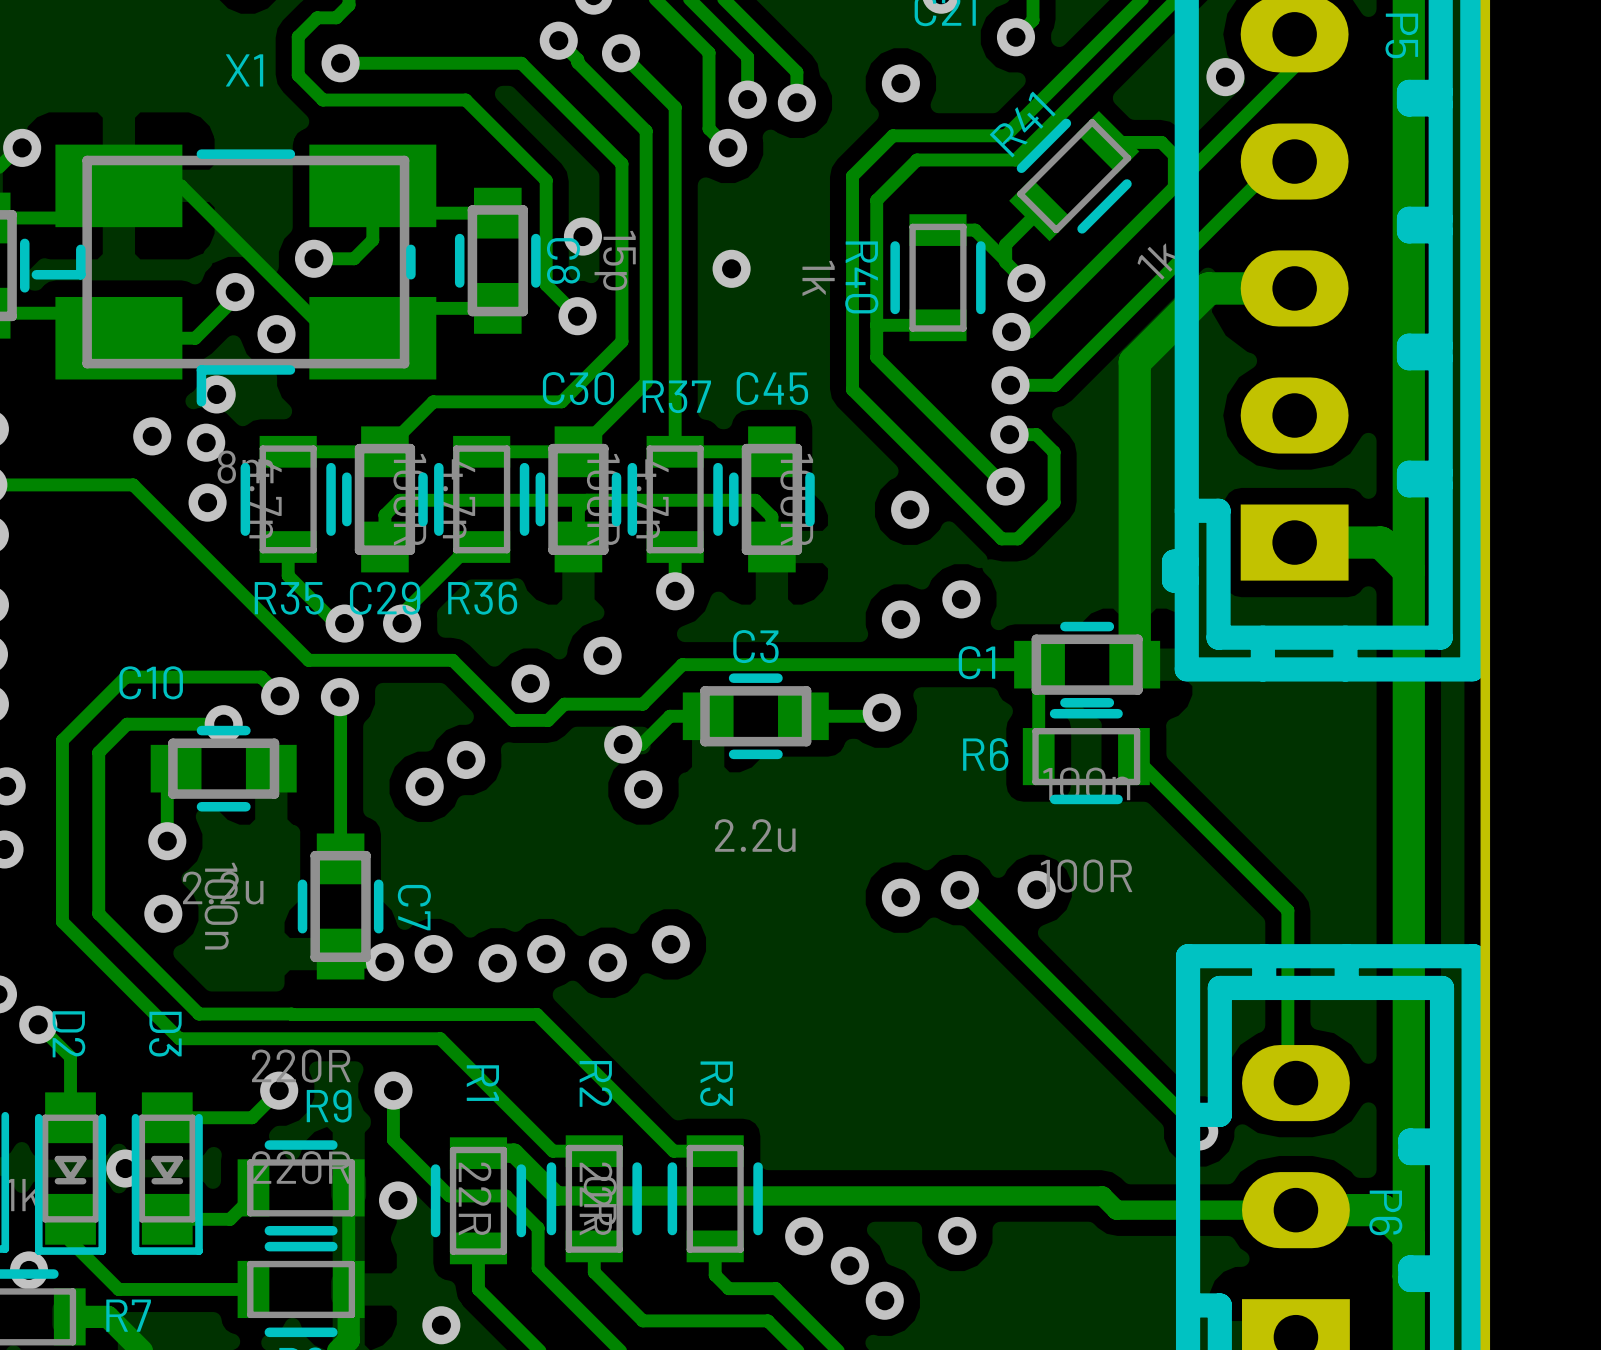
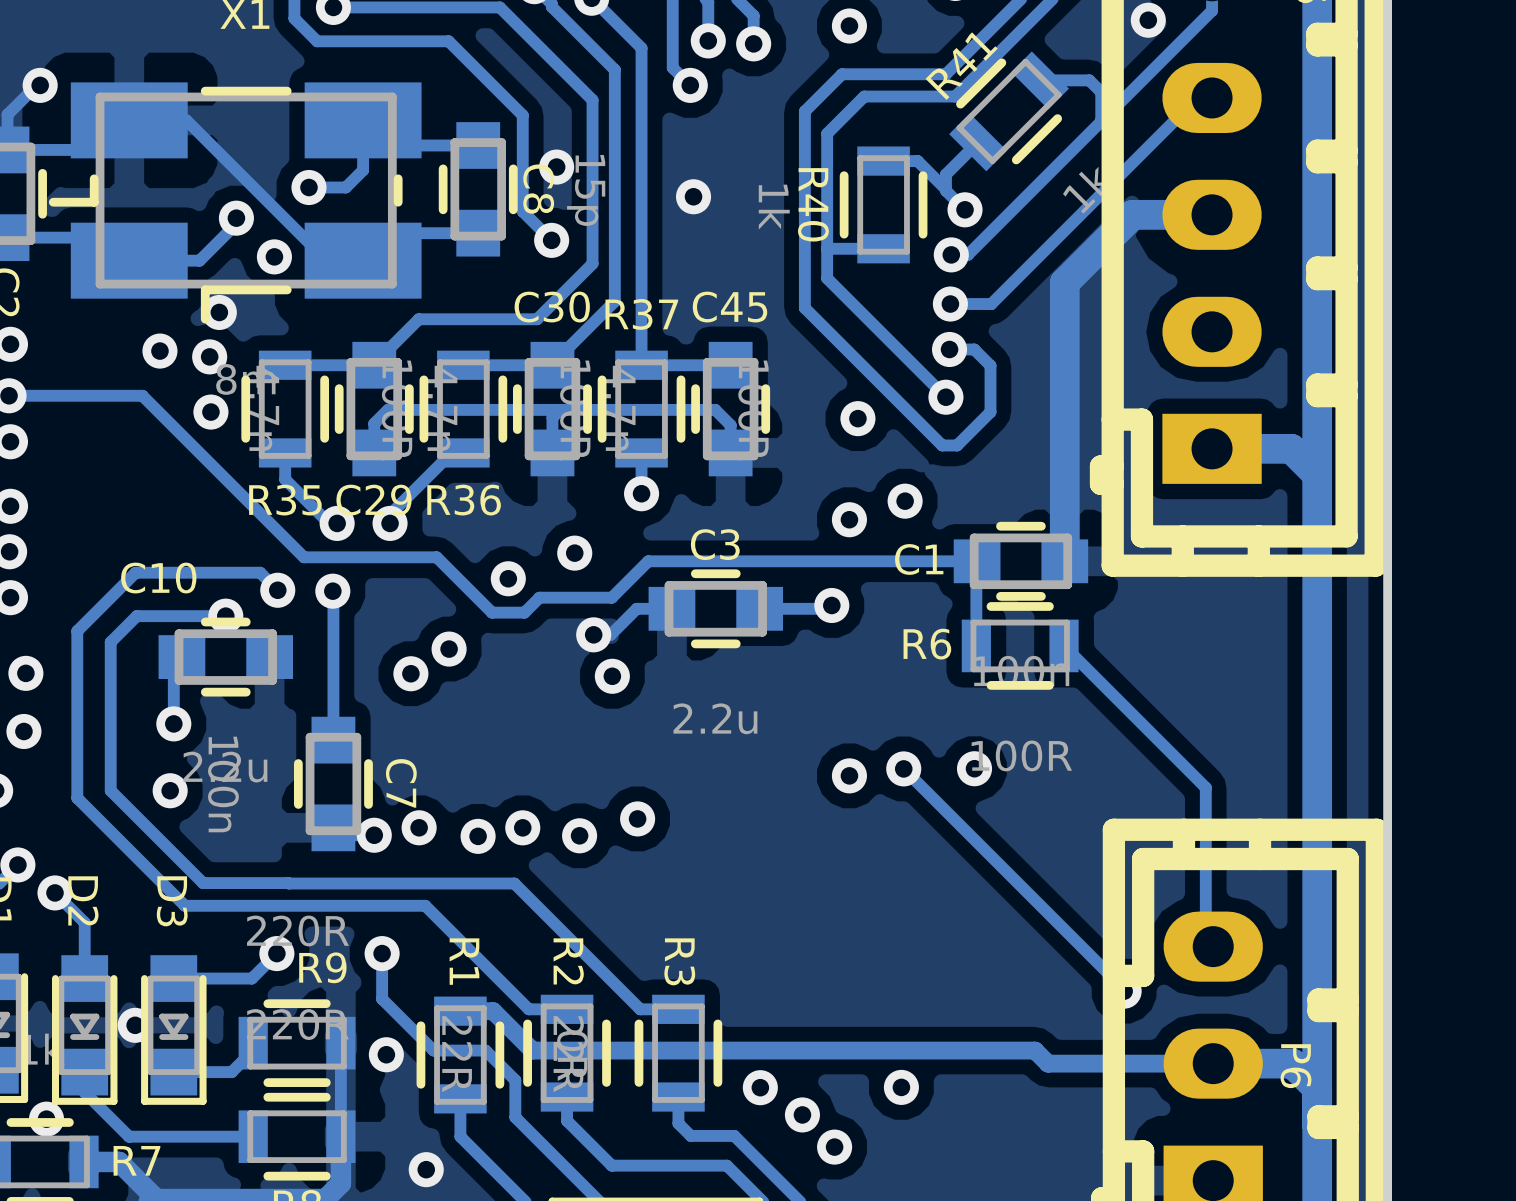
R1 name position: R1 (482, 1083) -> R1 (464, 961)
R2 name position: R2 (595, 1083) -> R2 (568, 961)
R3 name position: R3 (716, 1083) -> R3 (679, 961)

